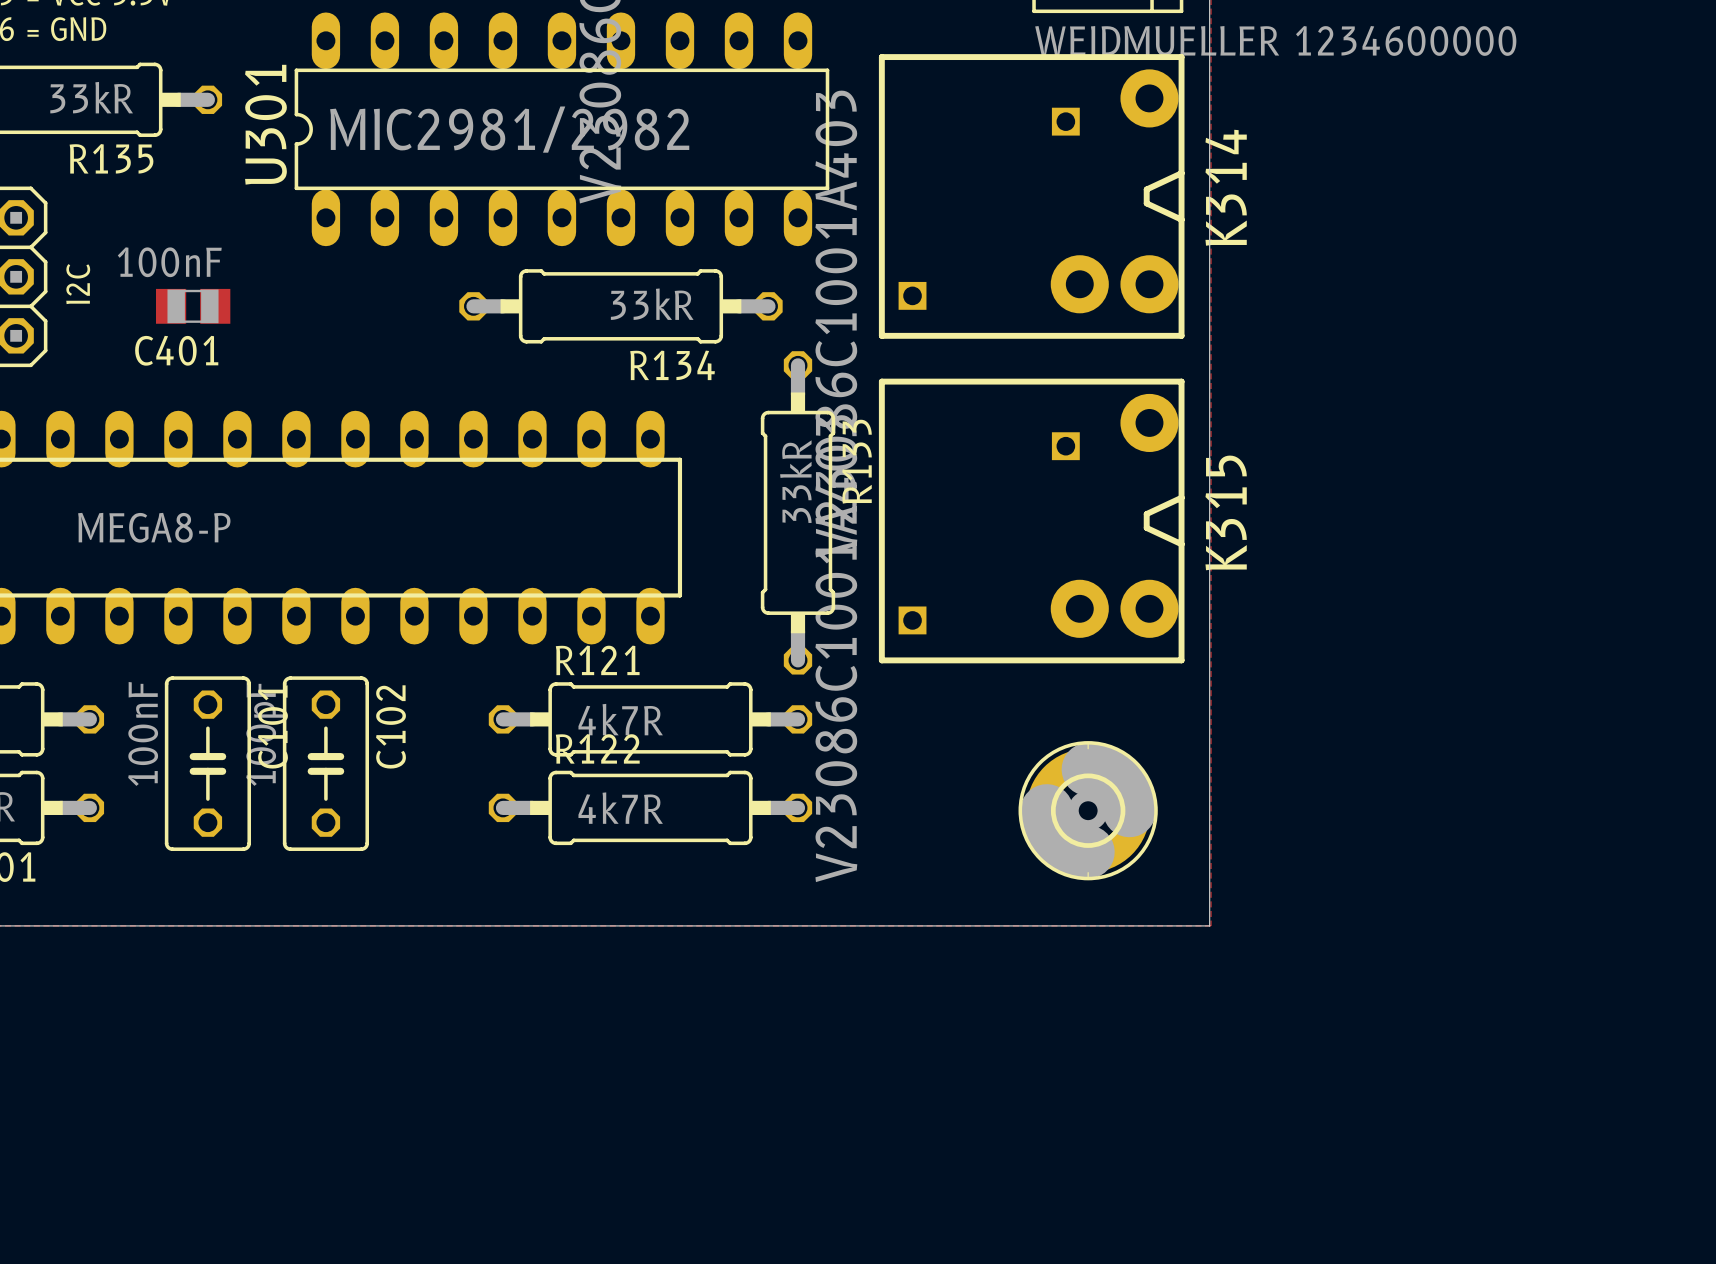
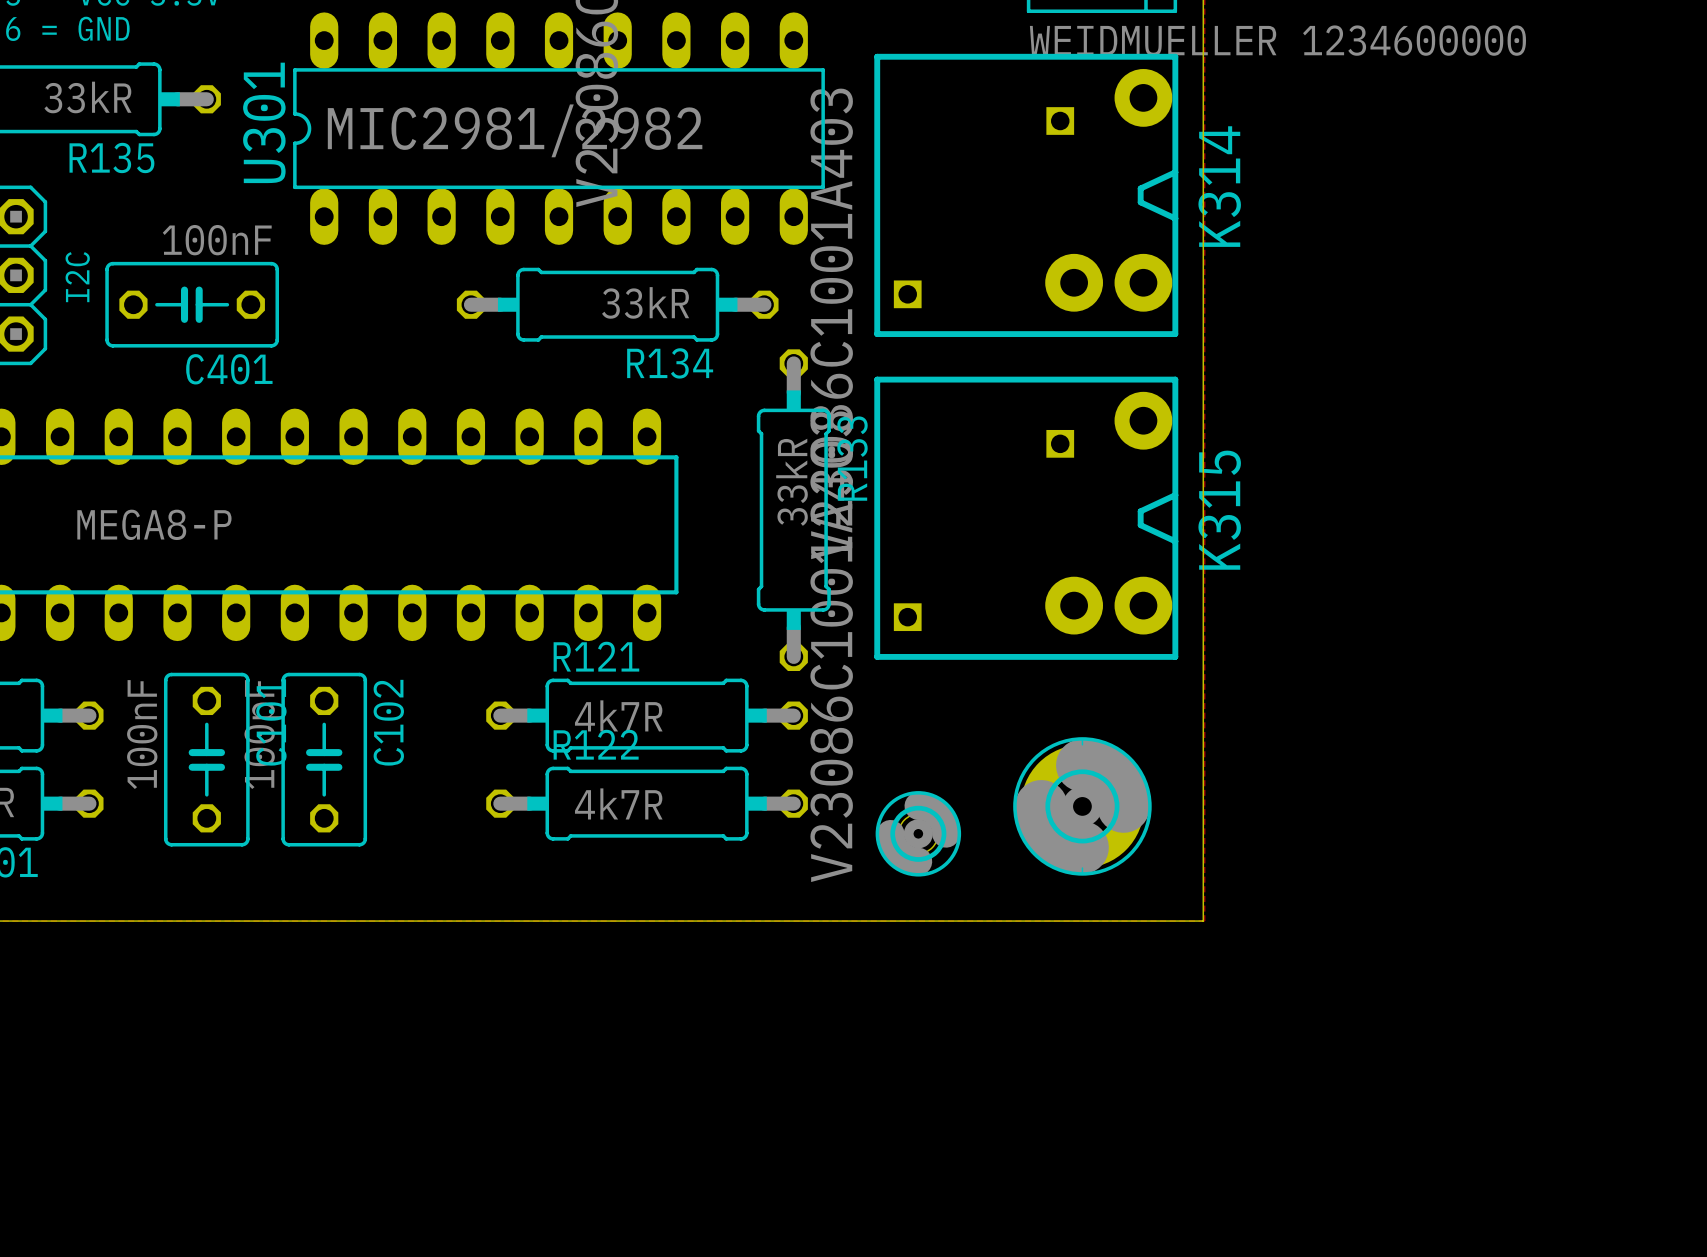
C401 value position: 100nF (169, 262) -> 100nF (217, 240)
C401 footprint: [155, 288, 231, 324] -> [105, 261, 280, 348]
C401 name position: C401 (176, 350) -> C401 (229, 369)
part: none -> (918, 833)

